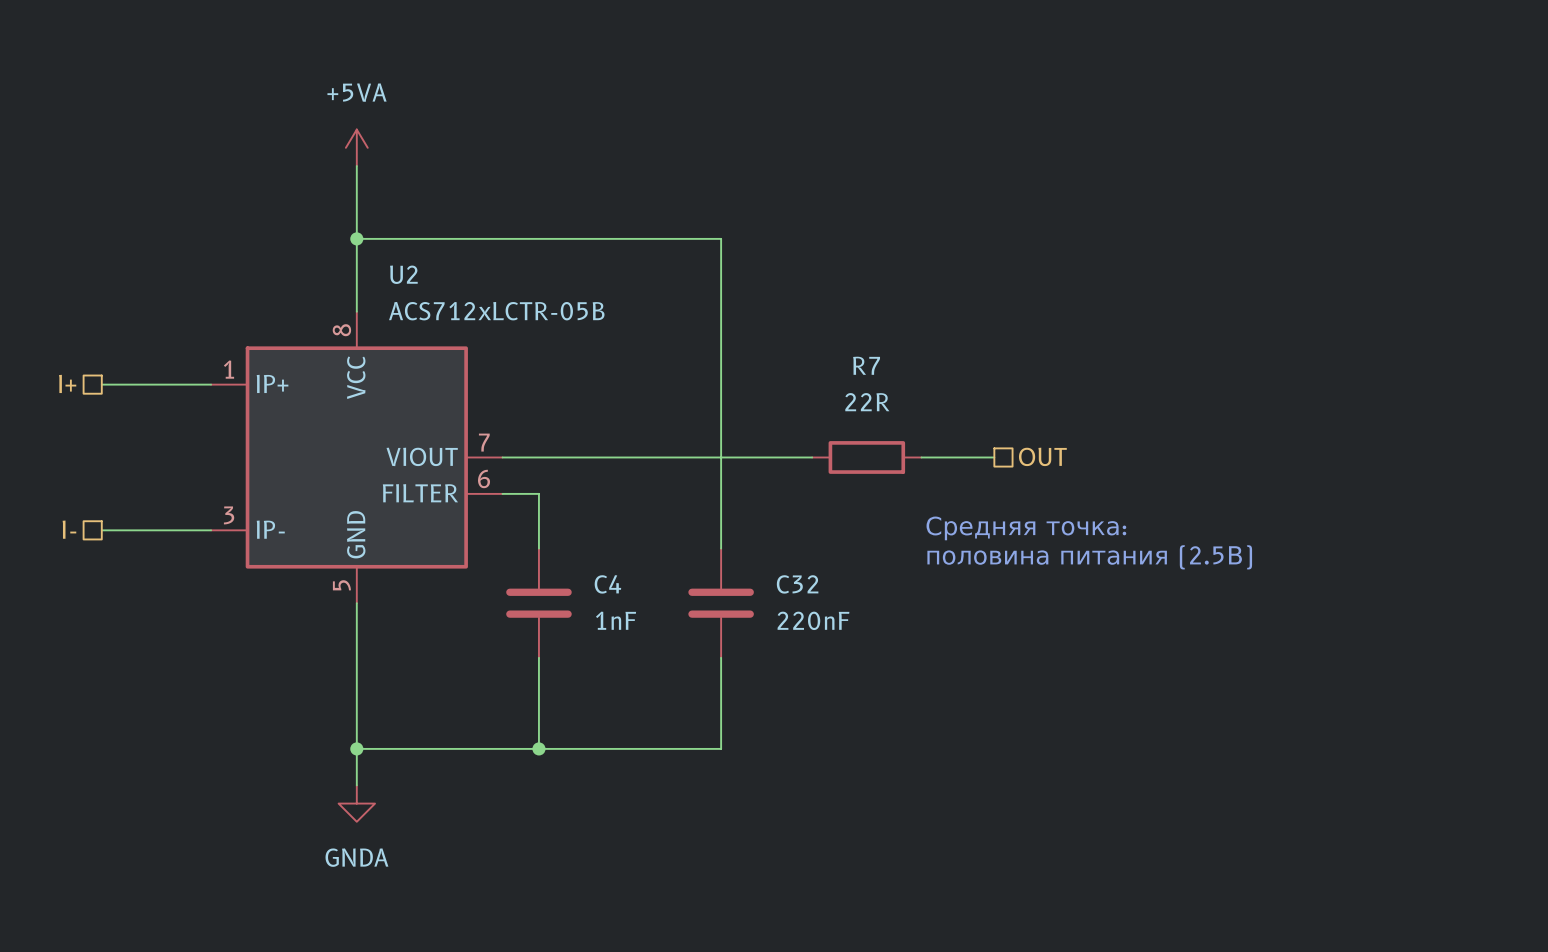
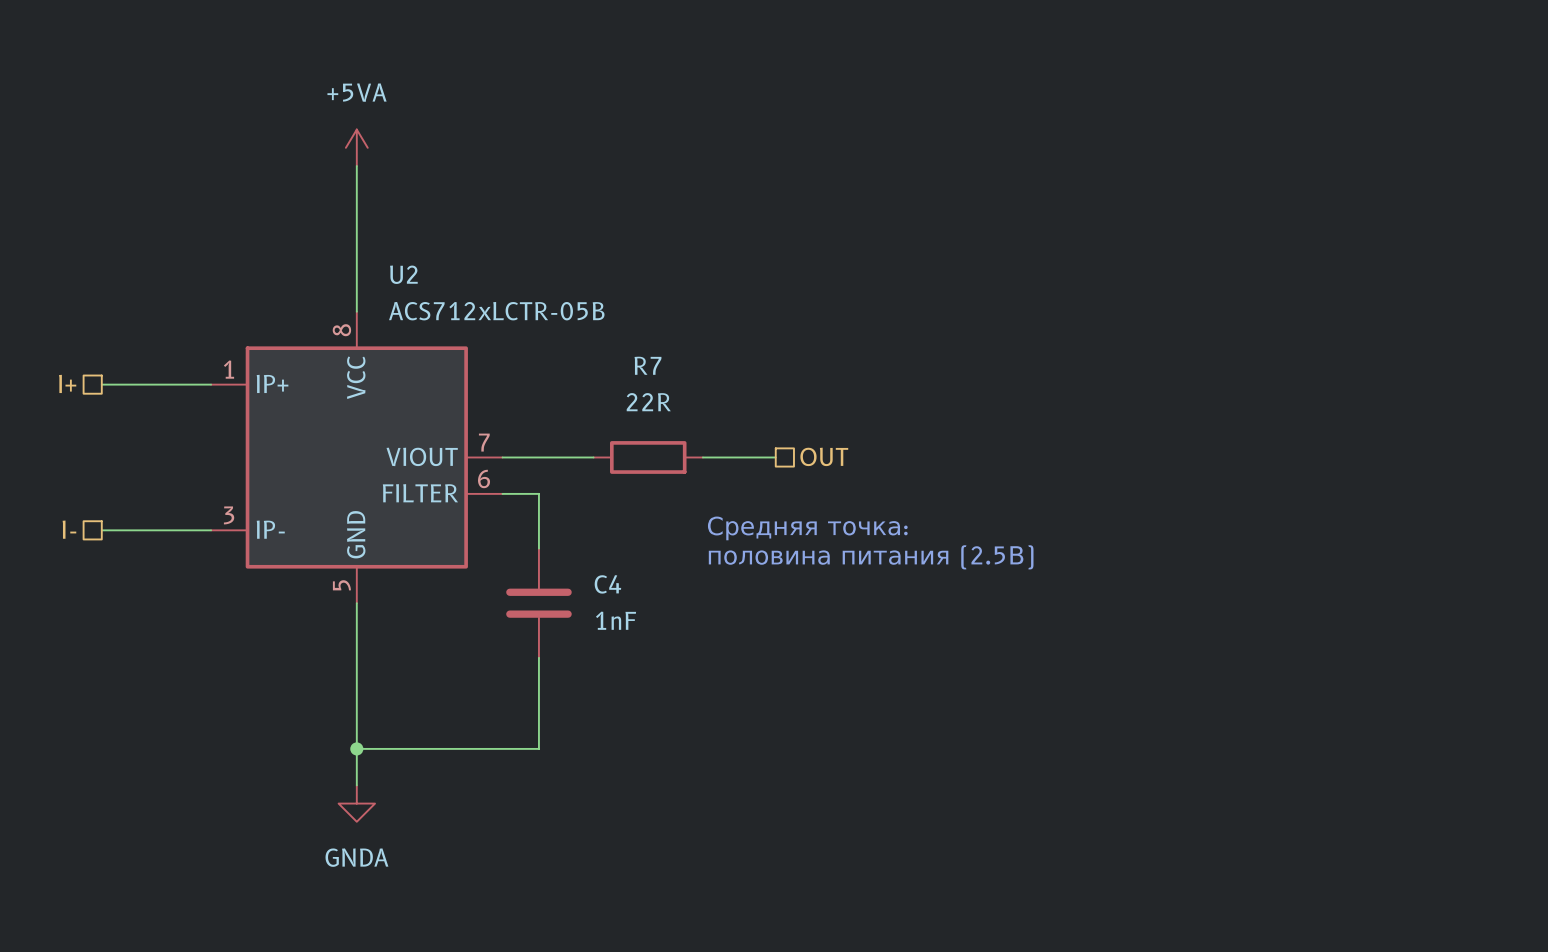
wire: (356, 238) (721, 238) (721, 548) -> none
junction: (356, 238) -> none
hierarchical label position: OUT (1042, 456) -> OUT (824, 456)
wire: (593, 457) (702, 457) -> none
wire: (775, 457) (812, 457) -> none
R7 position: (866, 457) -> (648, 457)
wire: (921, 457) (994, 457) -> none
text position: Средняя точка: (1026, 528) -> Средняя точка: (807, 528)
text position: половина питания (2.5В) (1089, 557) -> половина питания (2.5В) (871, 557)
C32: 220nF (721, 603) -> none
wire: (721, 657) (721, 748) (538, 748) -> none
junction: (538, 748) -> none

